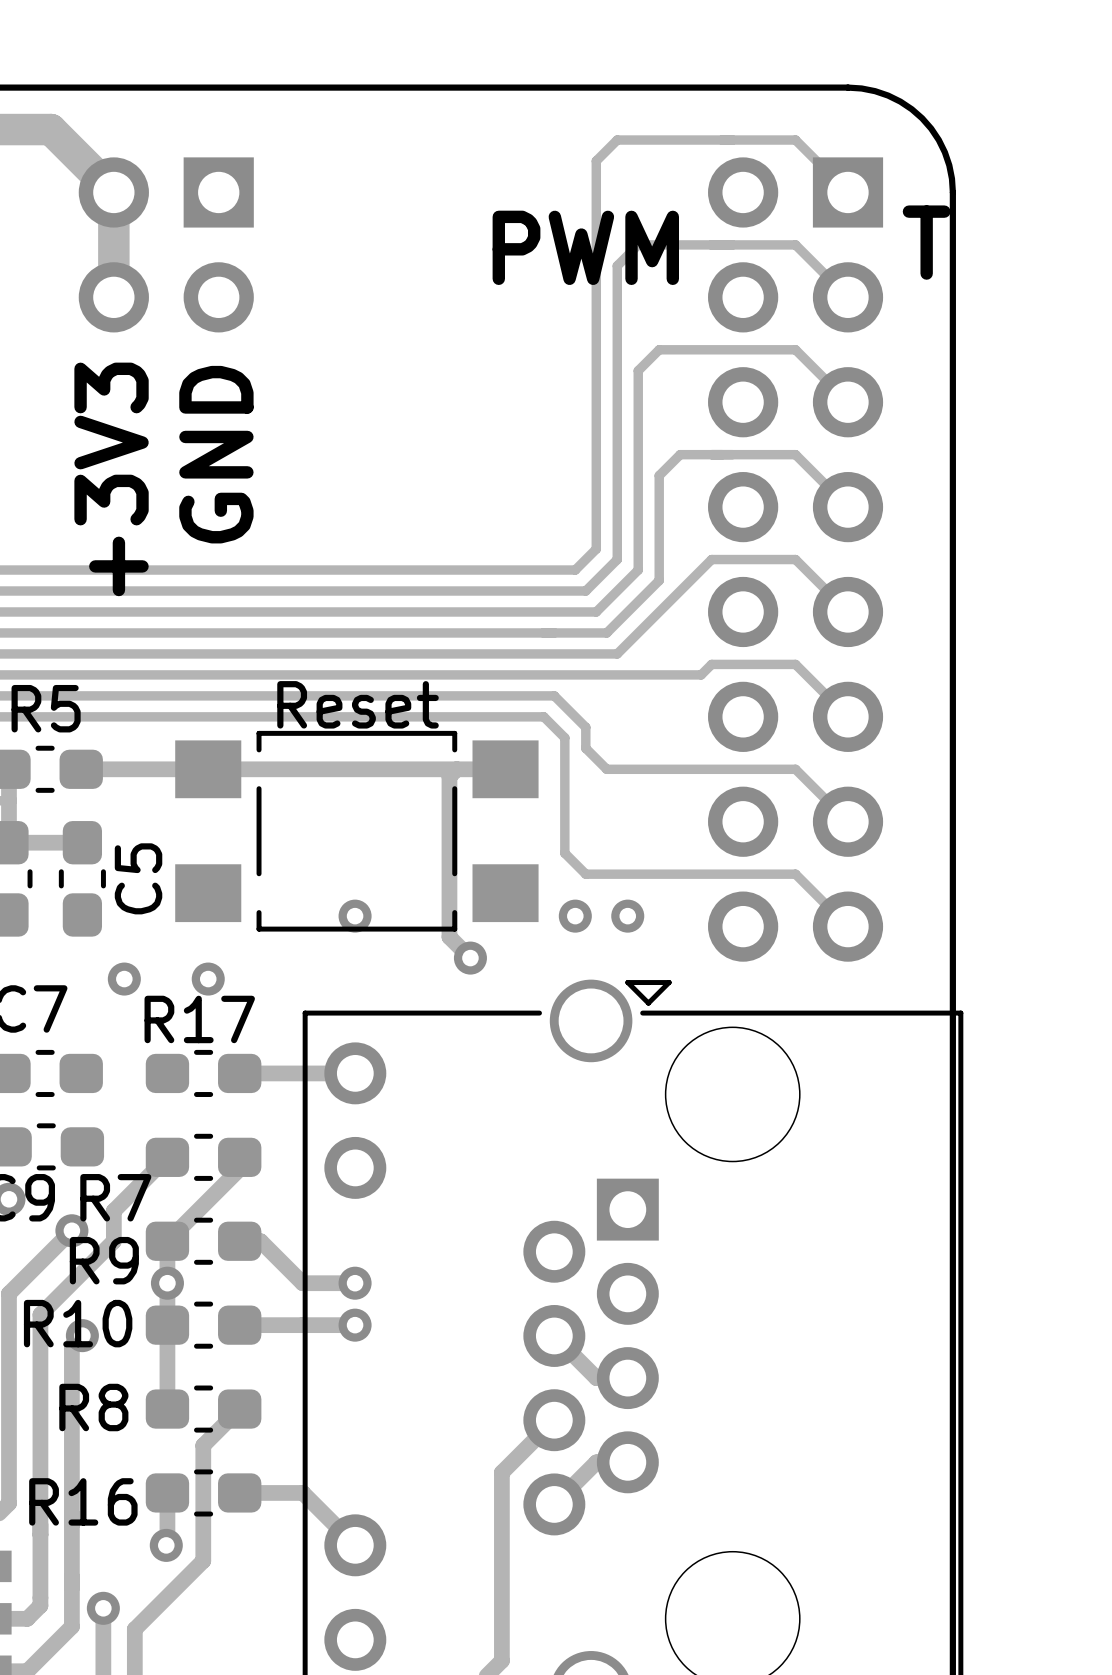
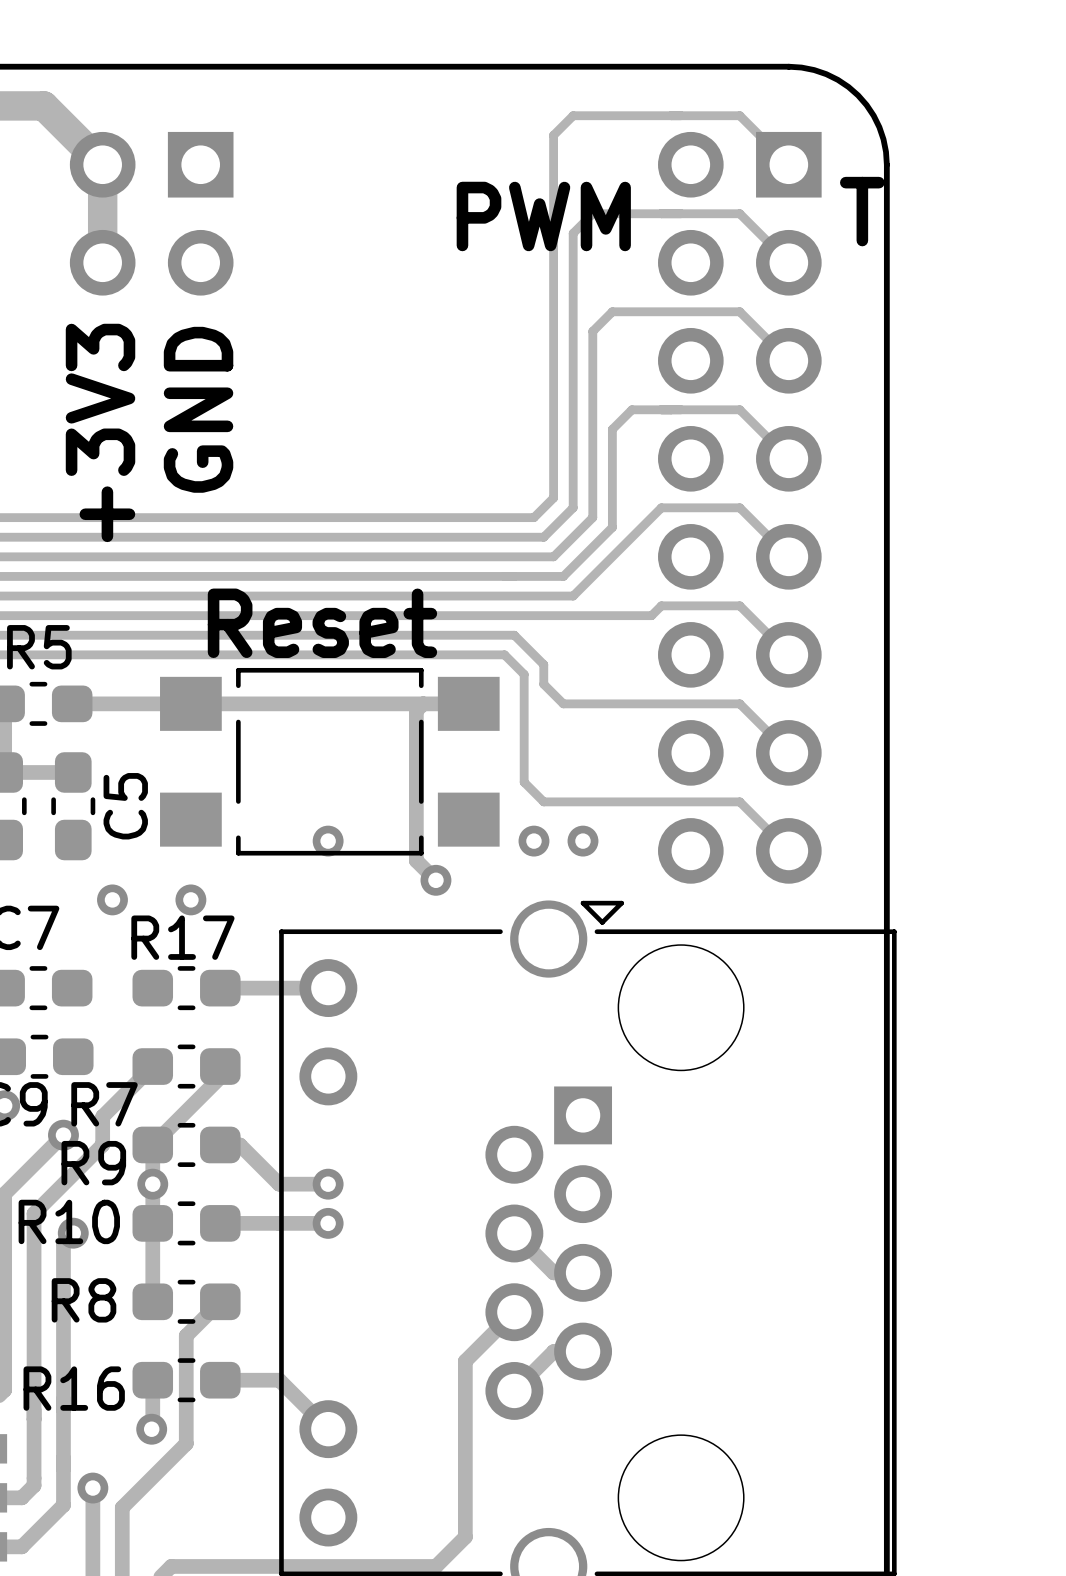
text: none -> Reset (322, 623)
Reset name: Reset (358, 704) -> none

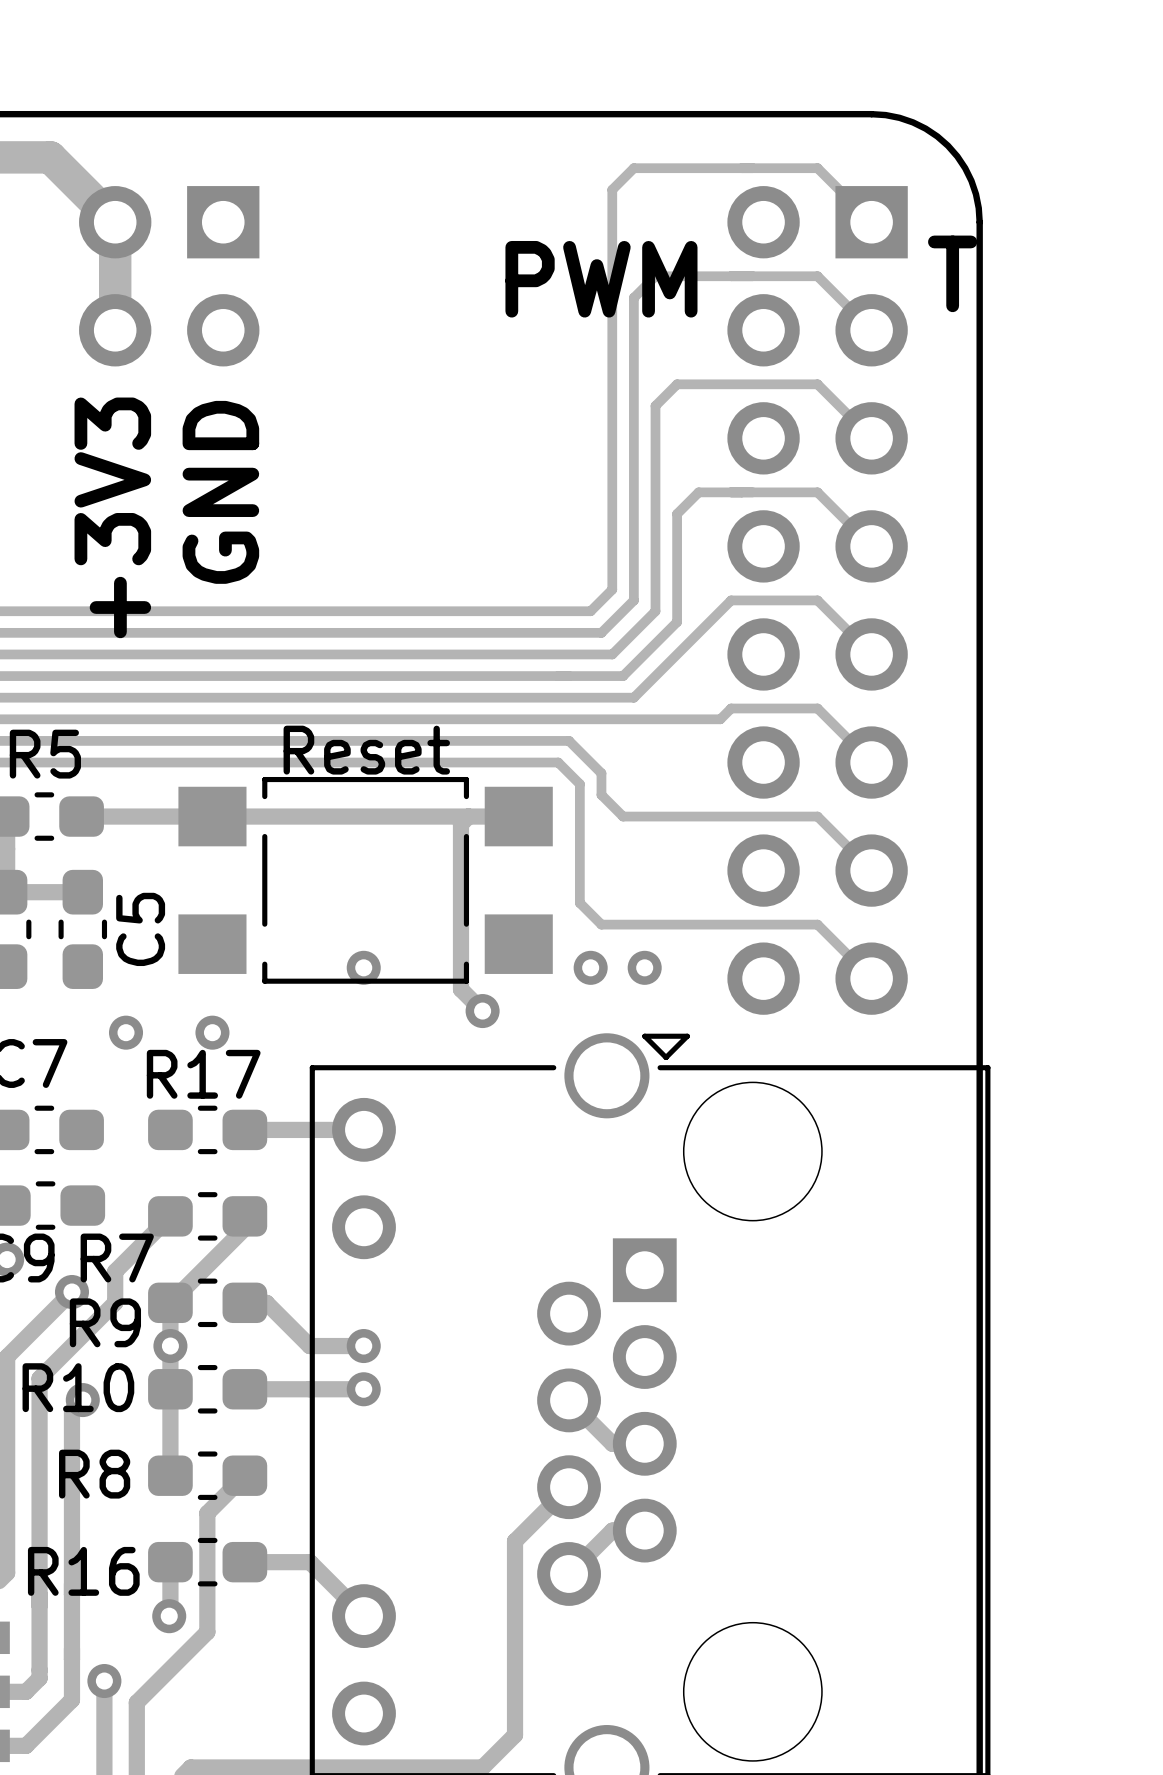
text: Reset (322, 623) -> none
Reset name: none -> Reset (366, 750)

